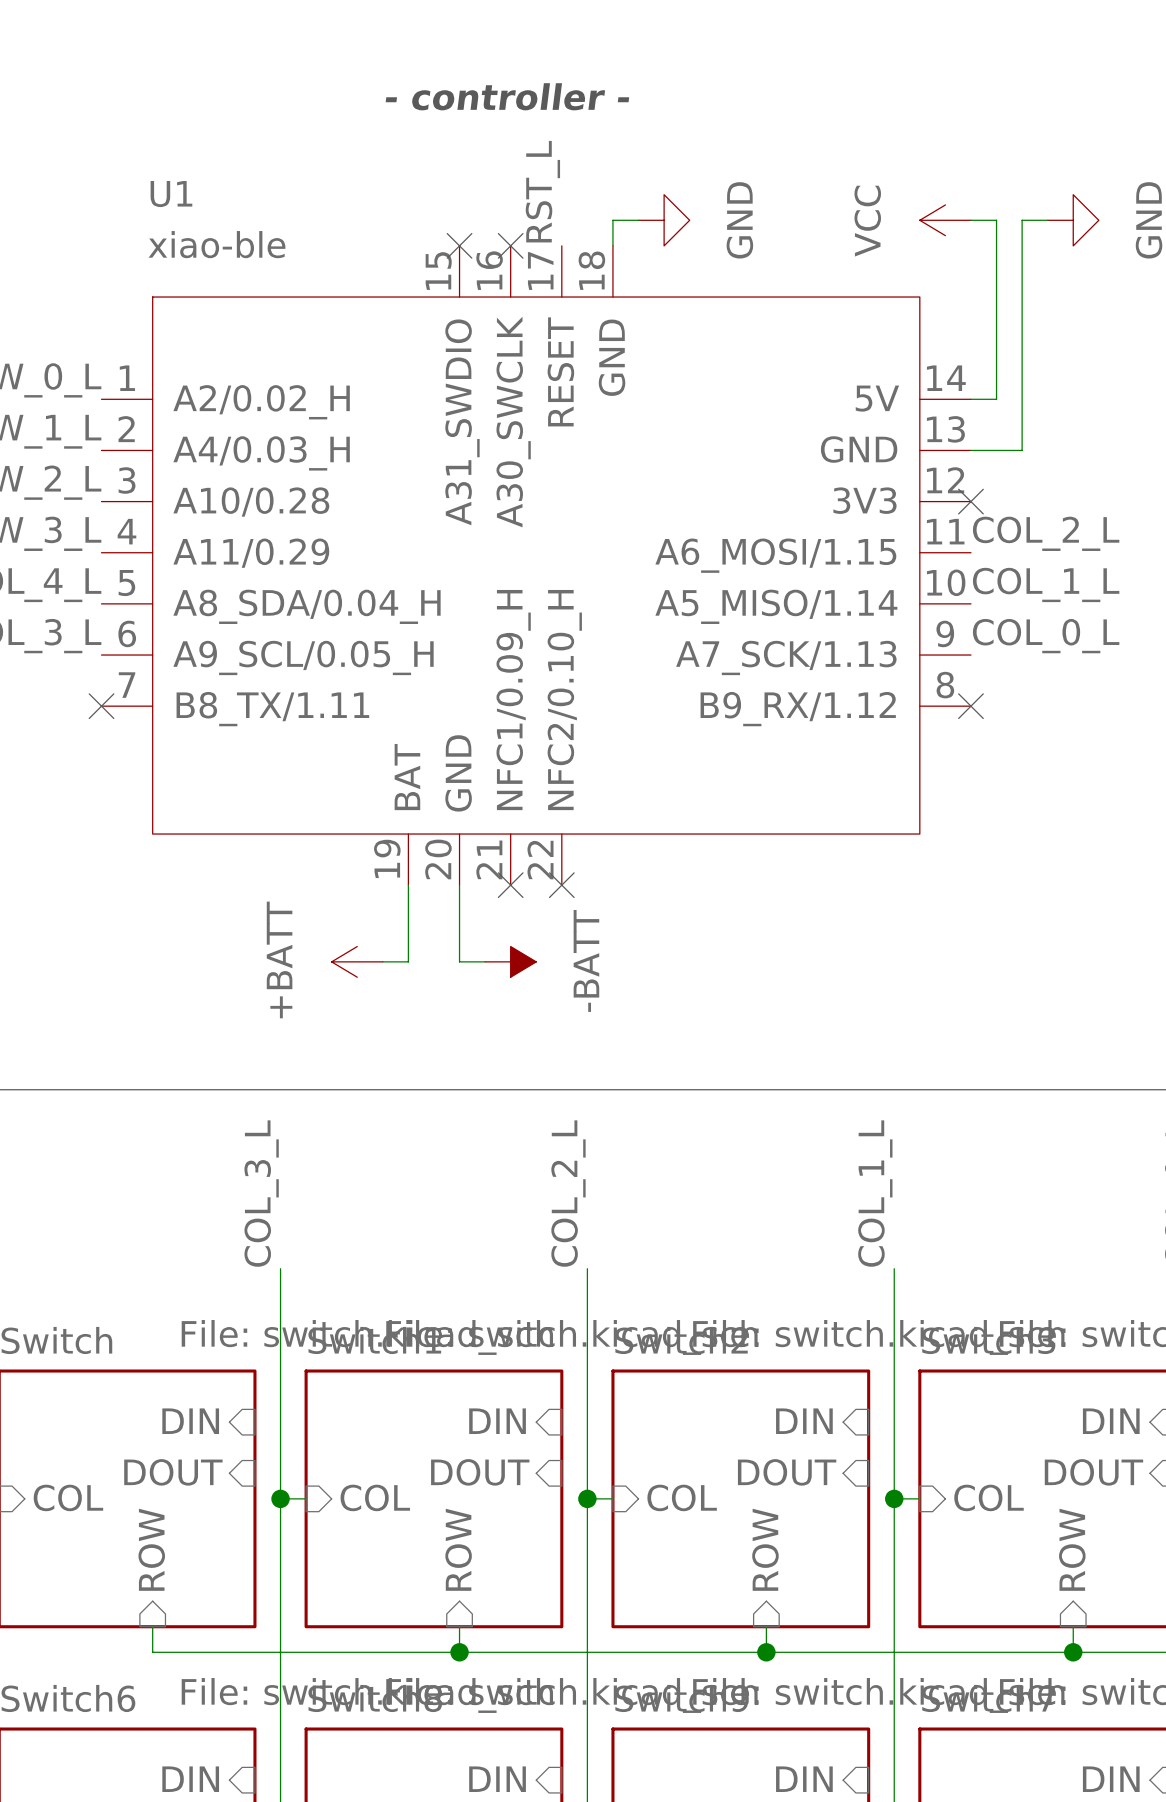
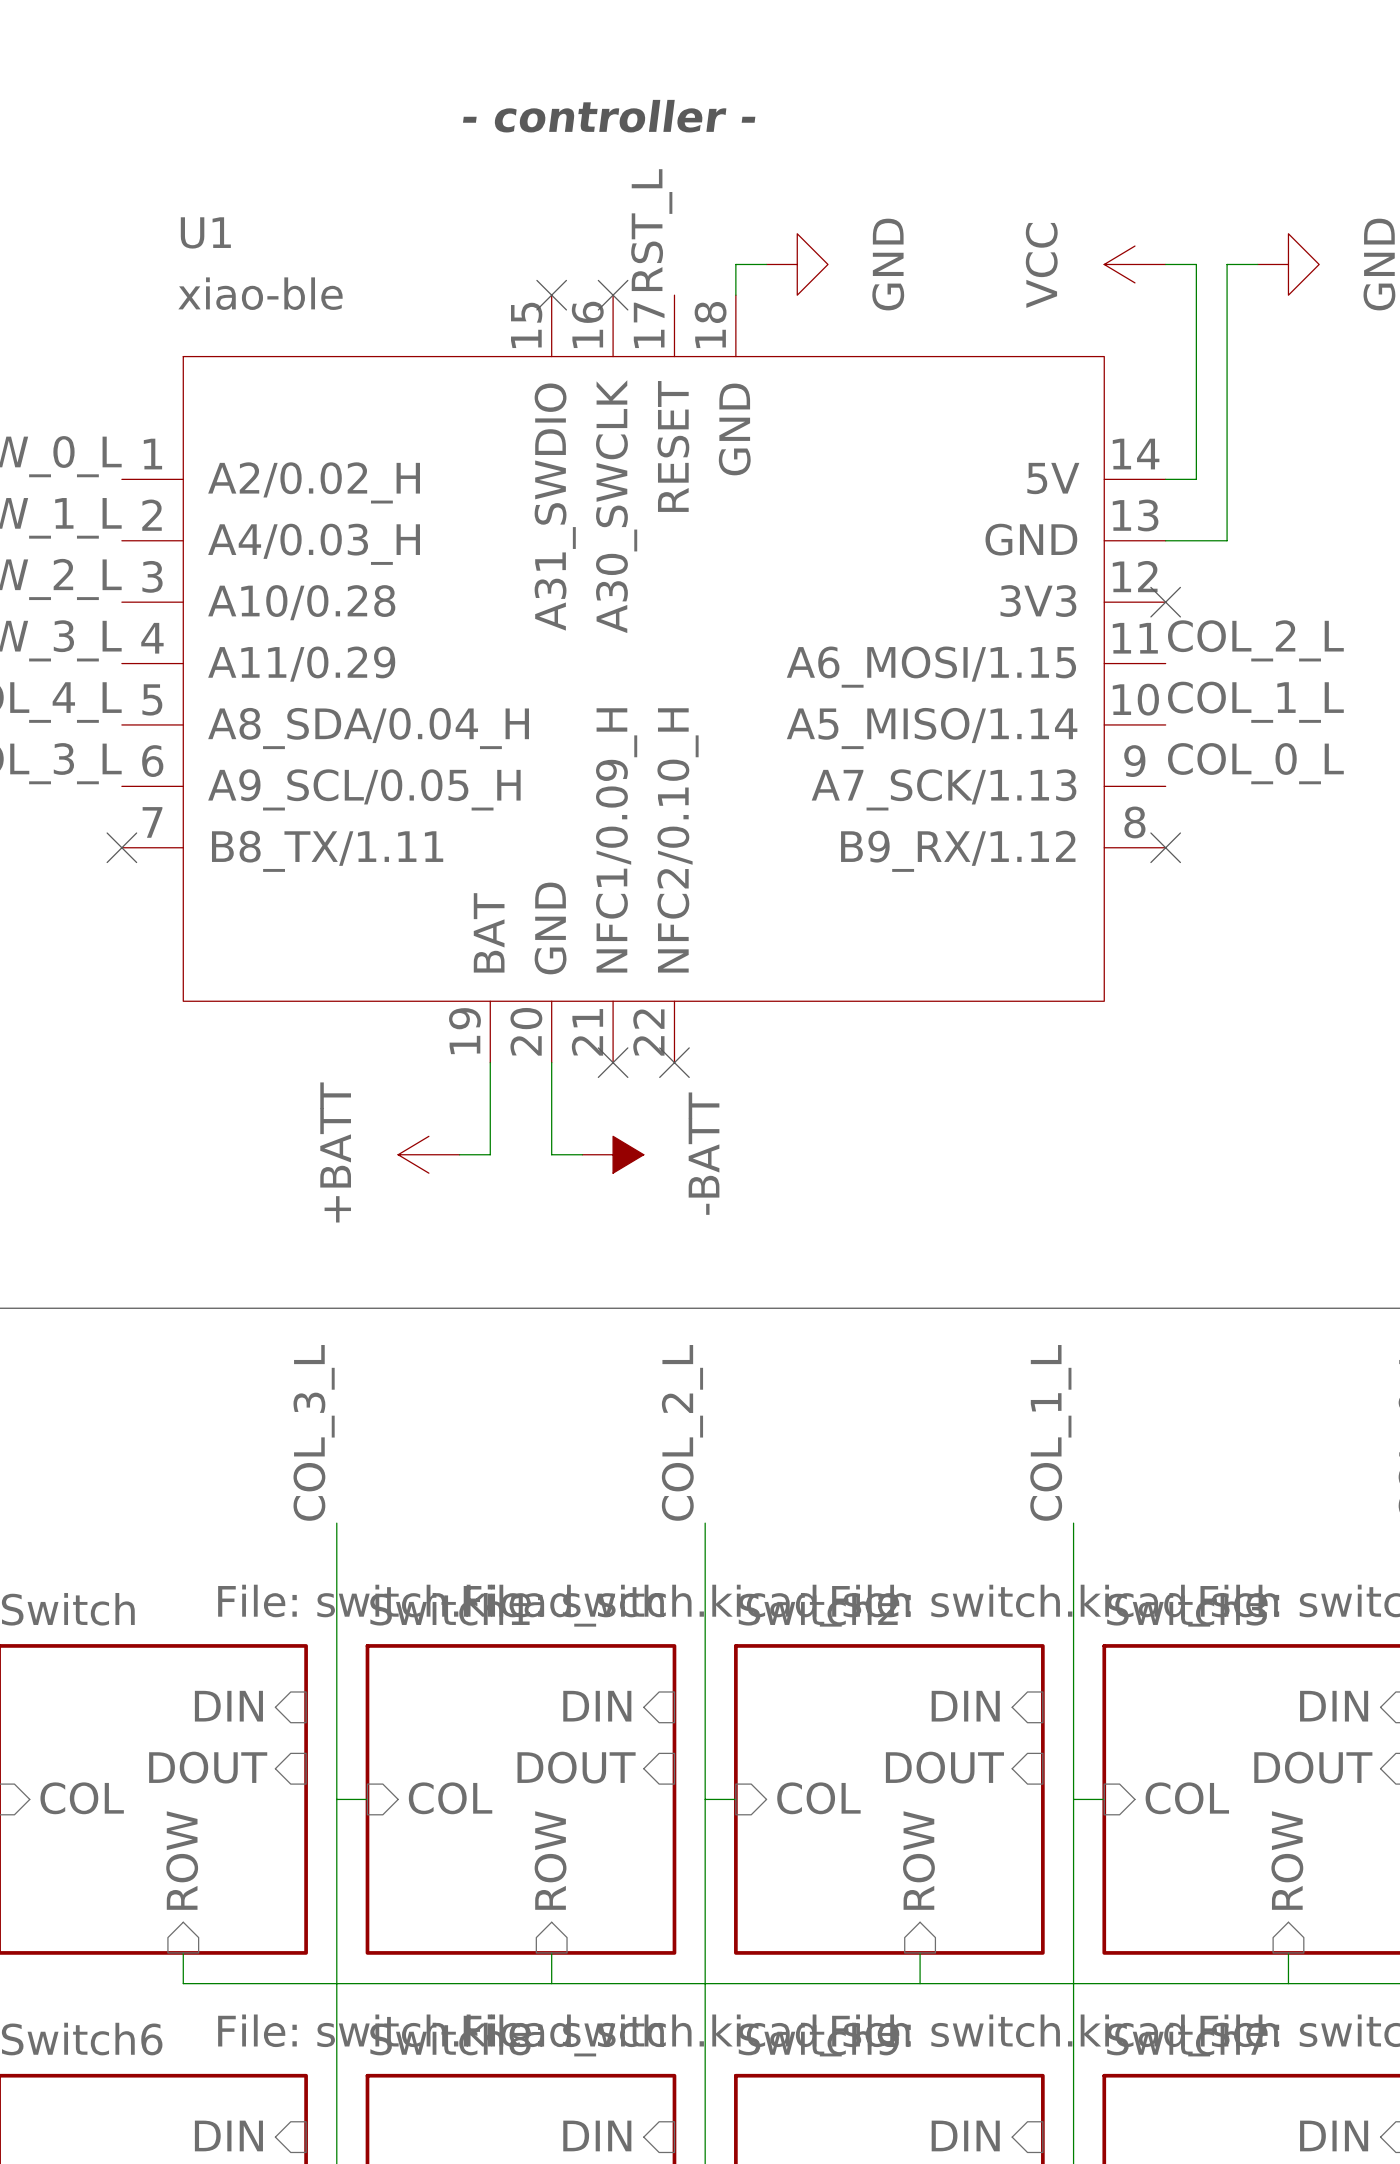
junction: (280, 1498) -> none
junction: (587, 1498) -> none
junction: (894, 1498) -> none
junction: (459, 1652) -> none
junction: (766, 1652) -> none
junction: (1073, 1652) -> none

